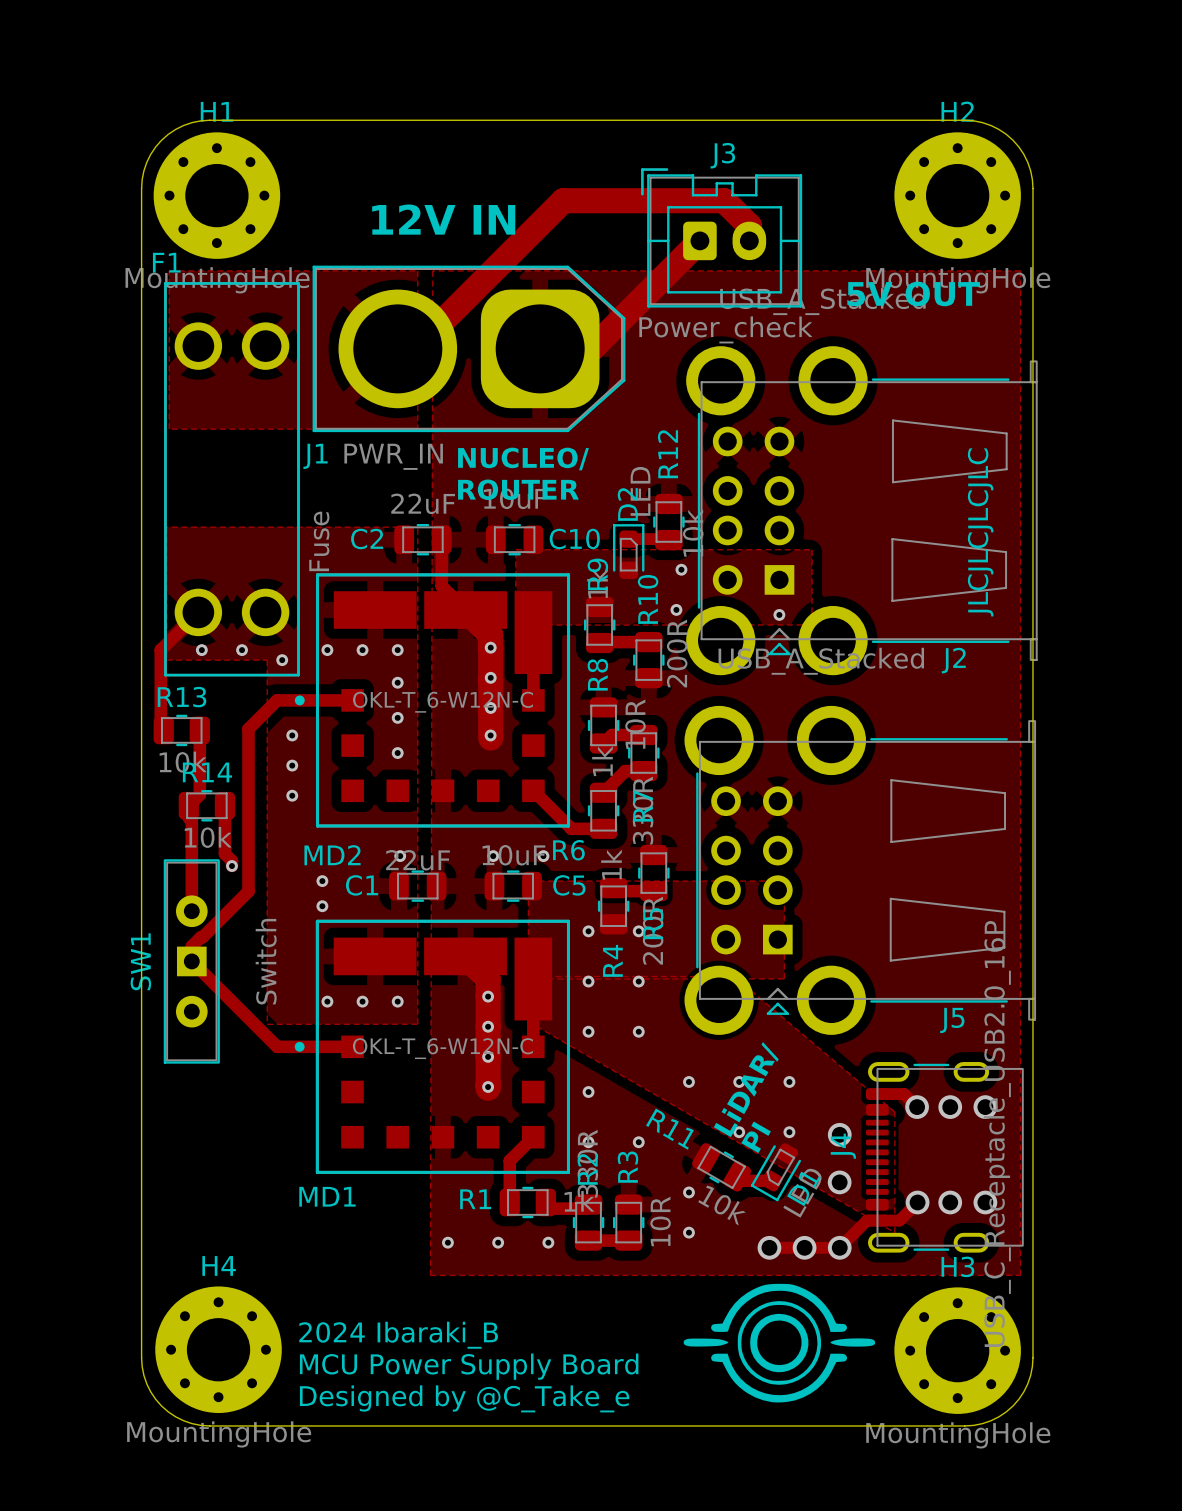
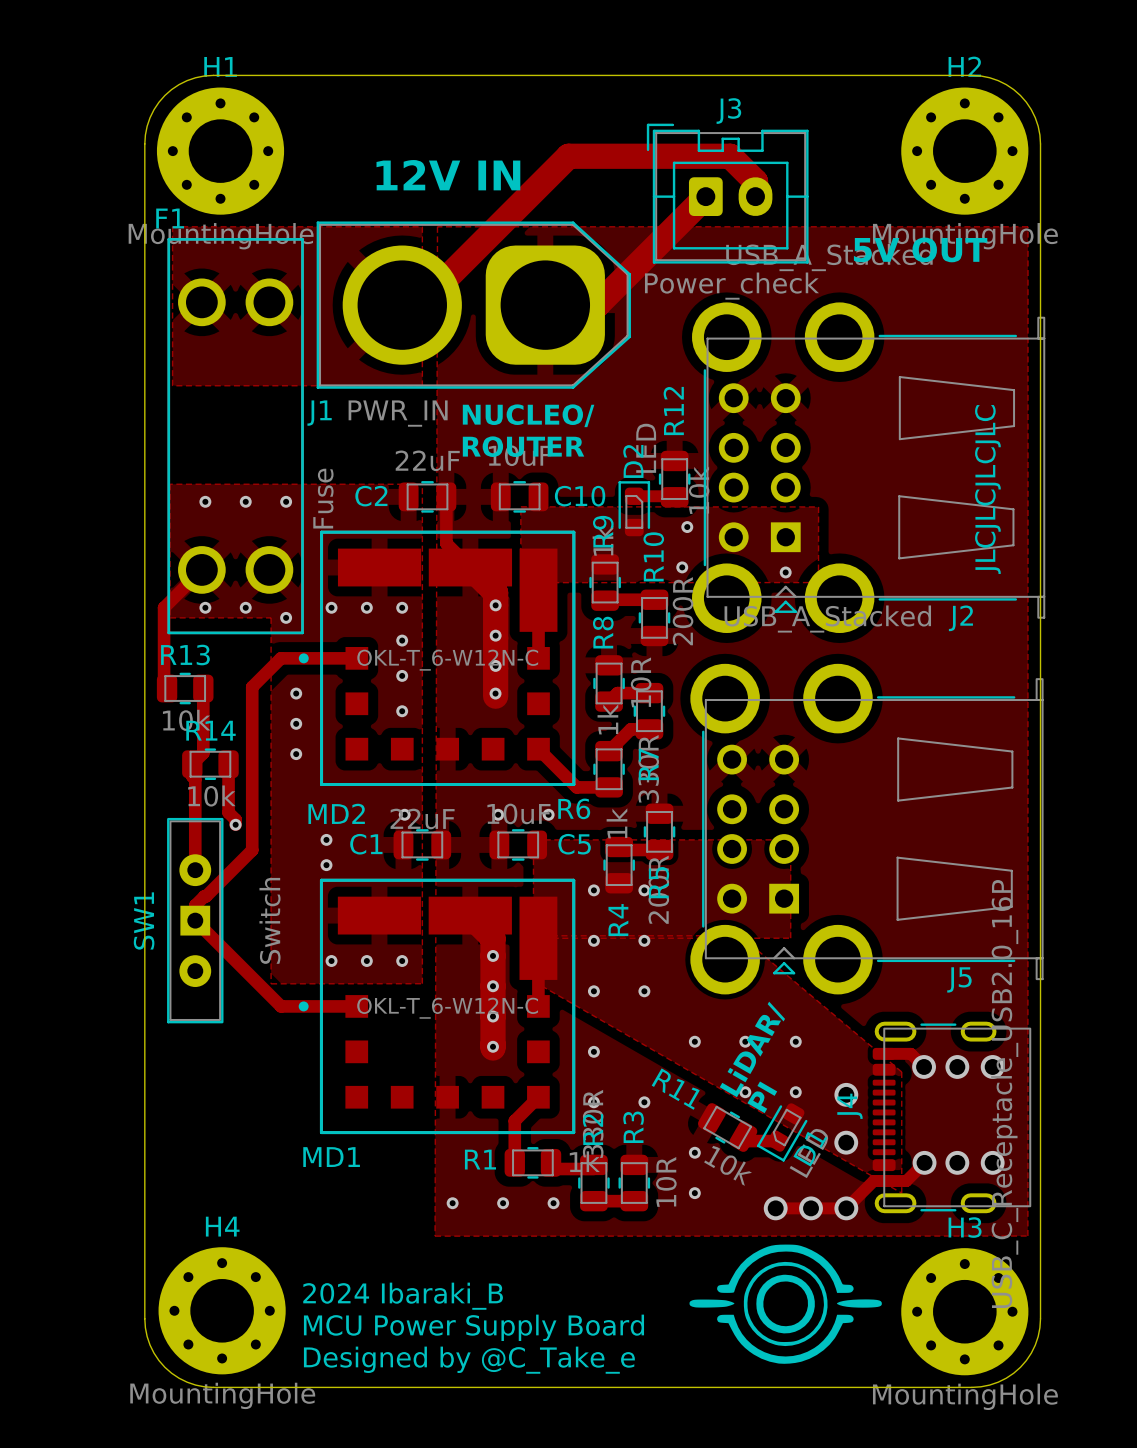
via: none -> (205, 501)
via: none -> (245, 501)
via: none -> (286, 501)

